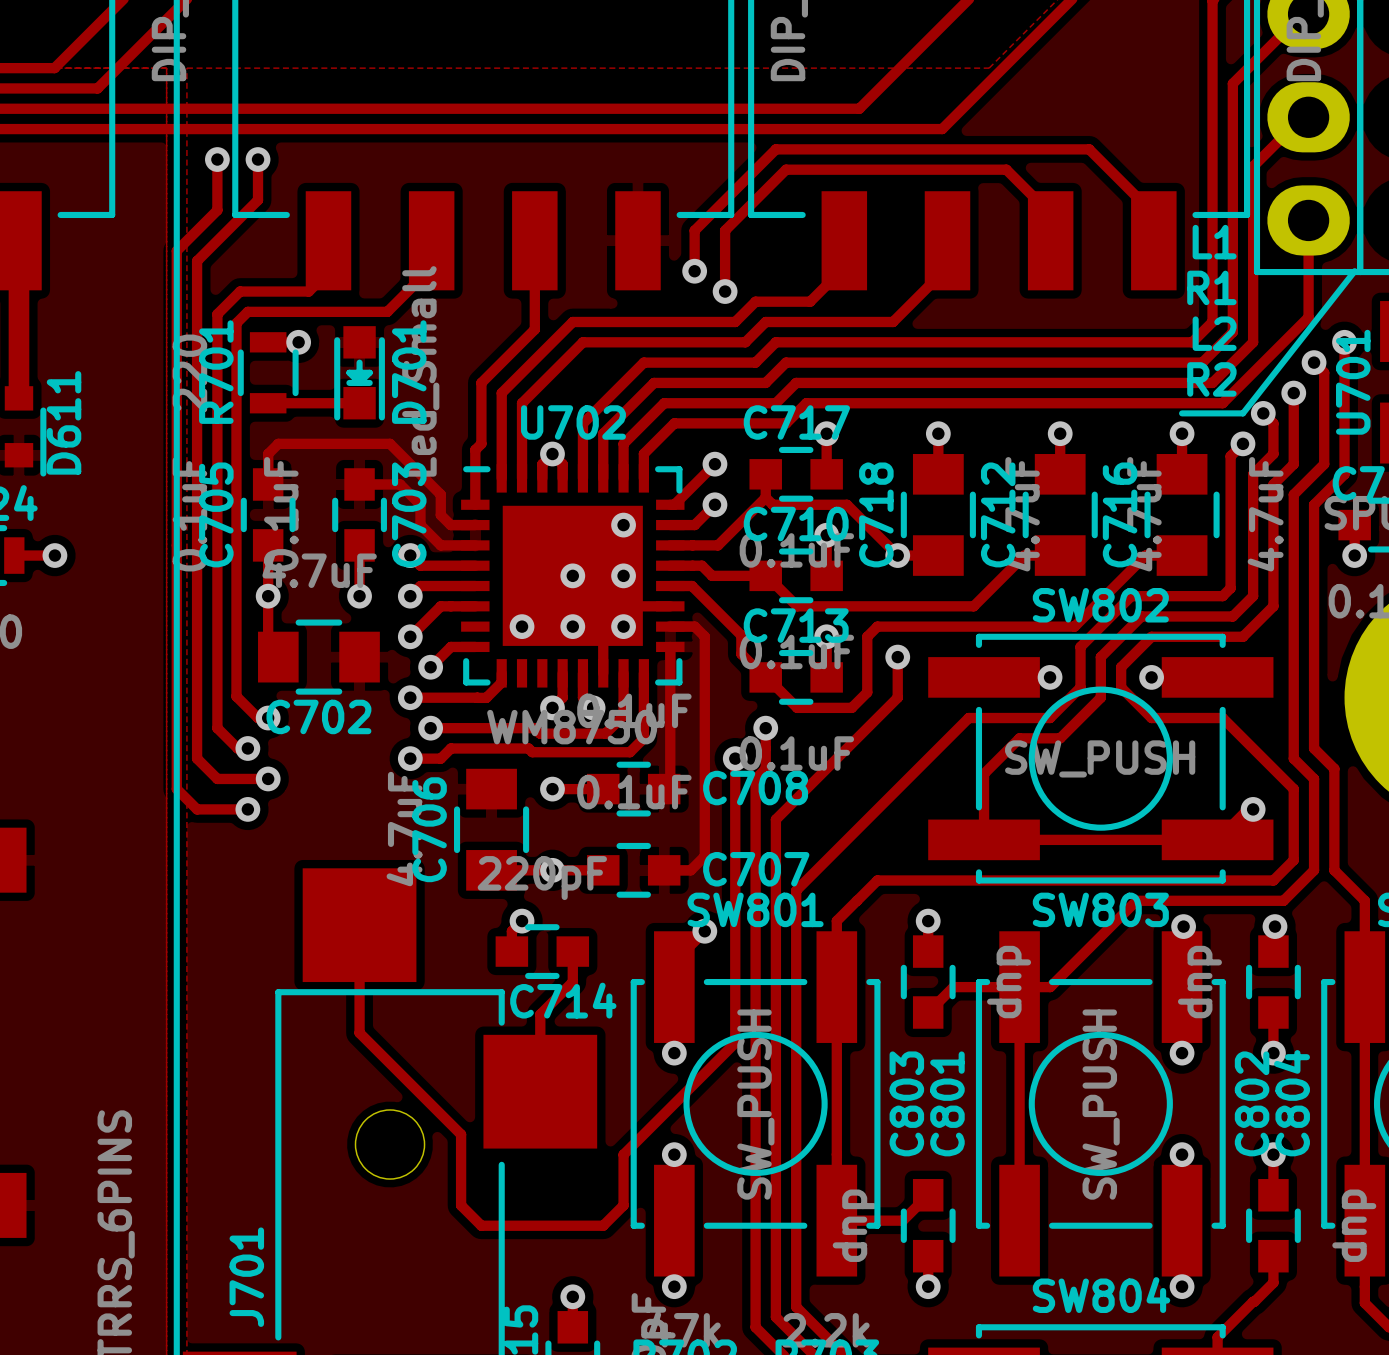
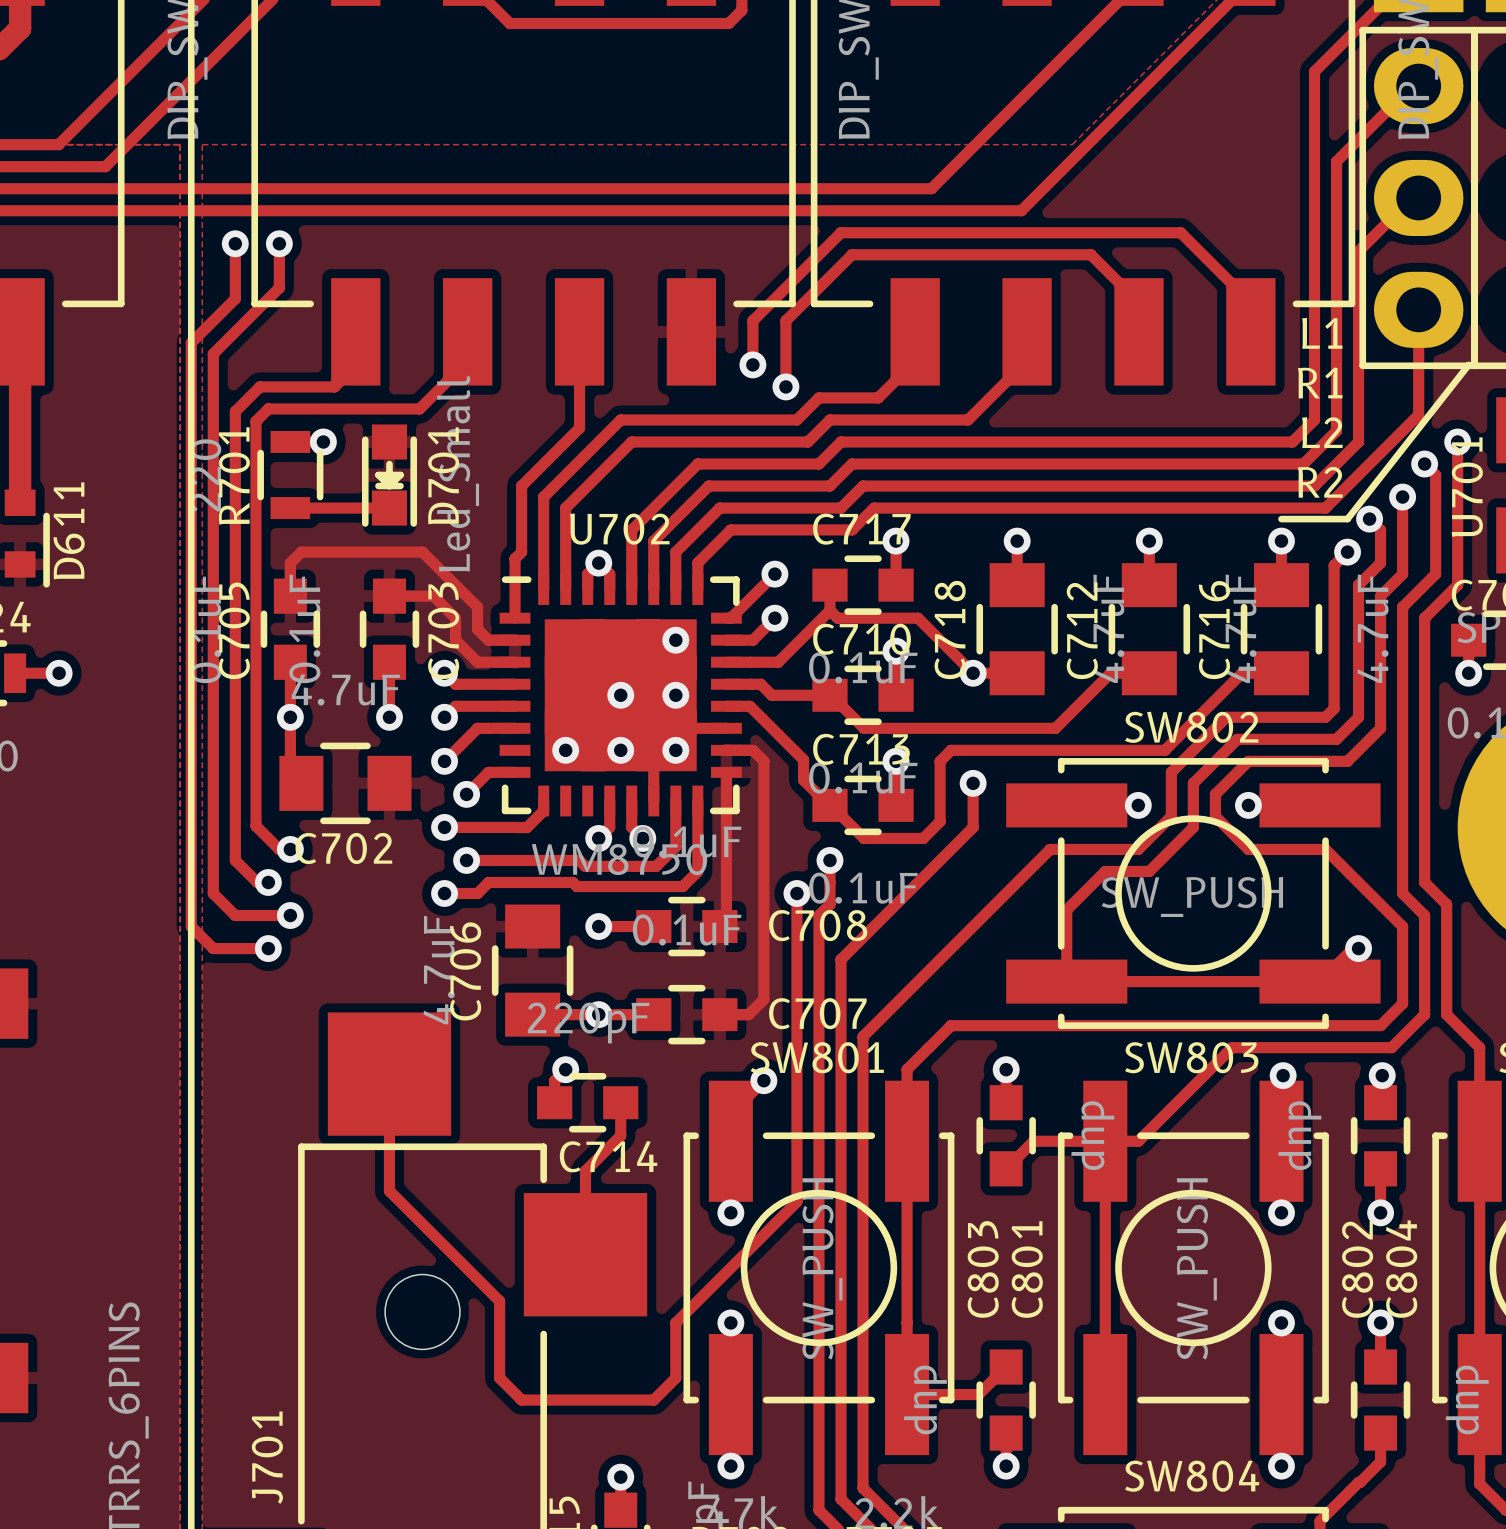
U702 footprint: [461, 464, 685, 688] -> [499, 574, 742, 817]

